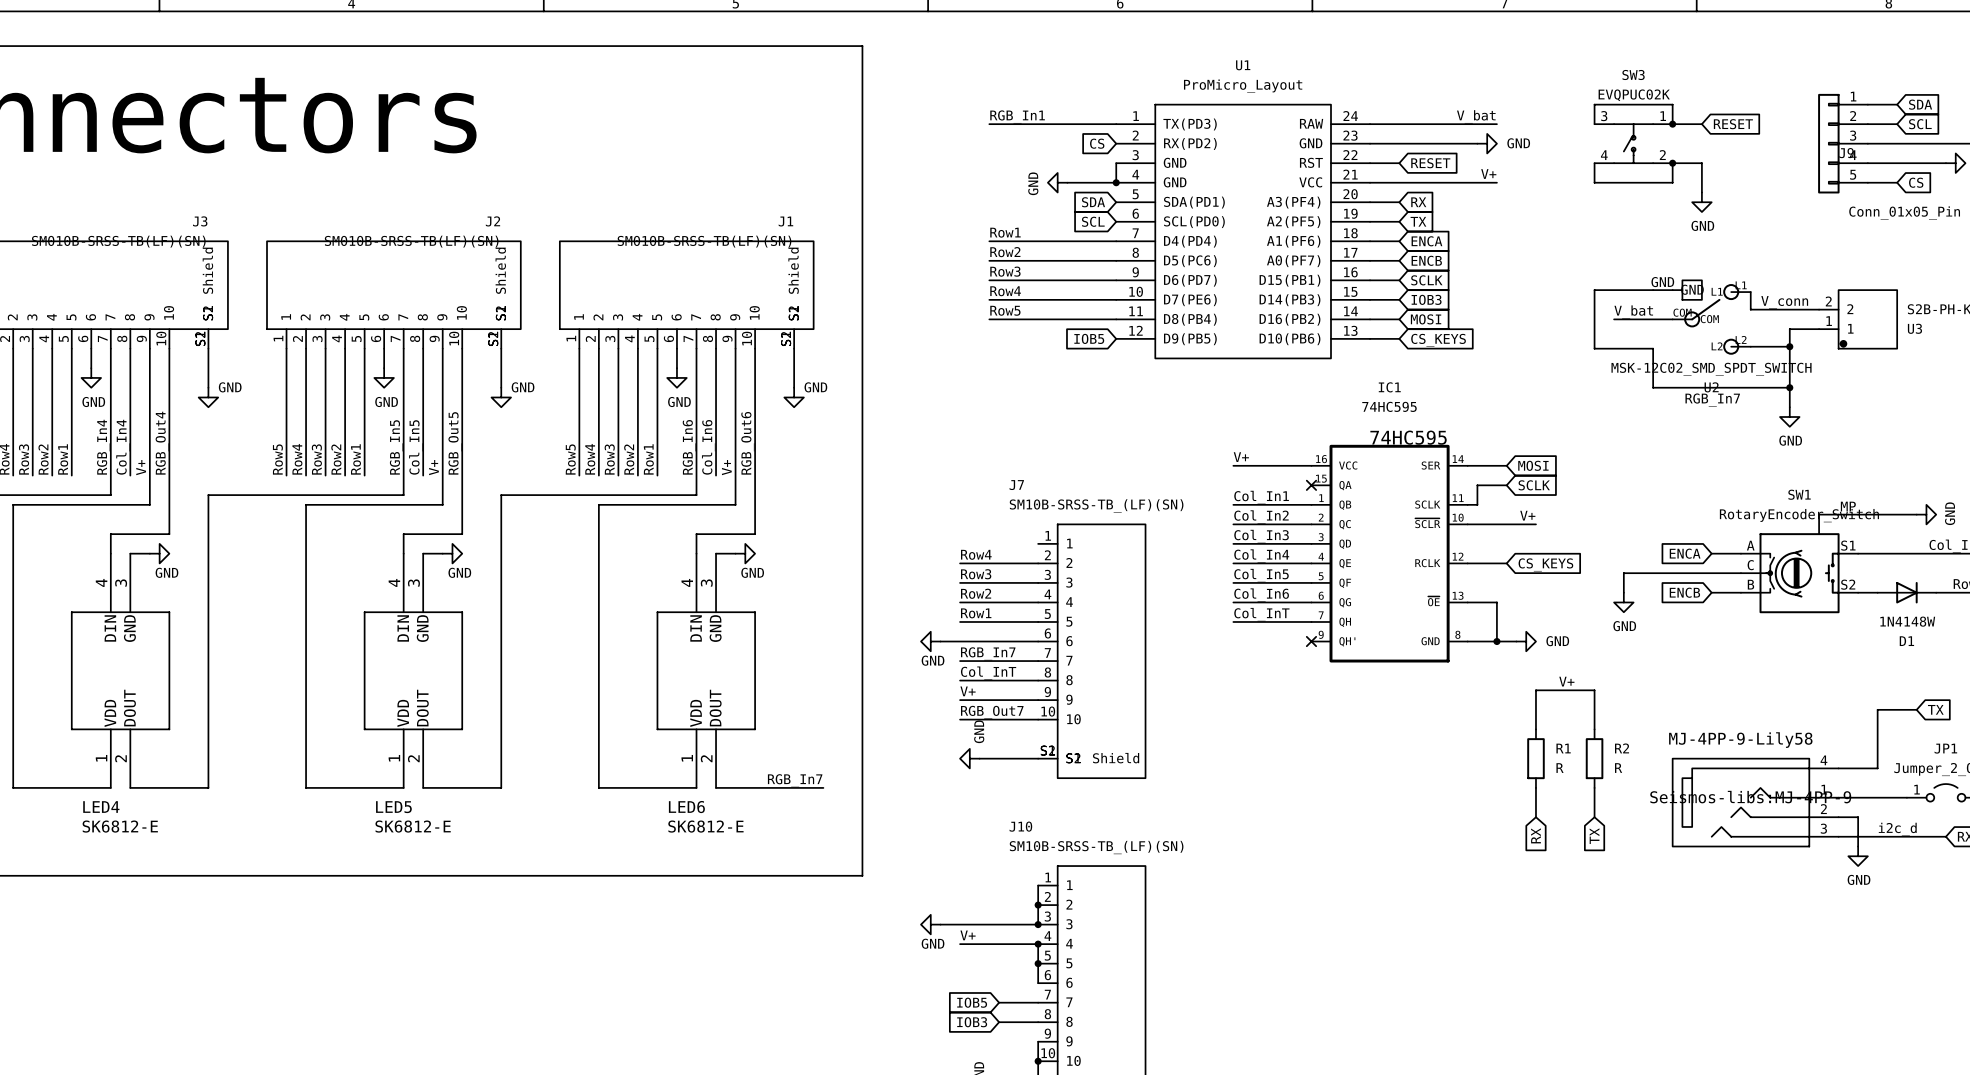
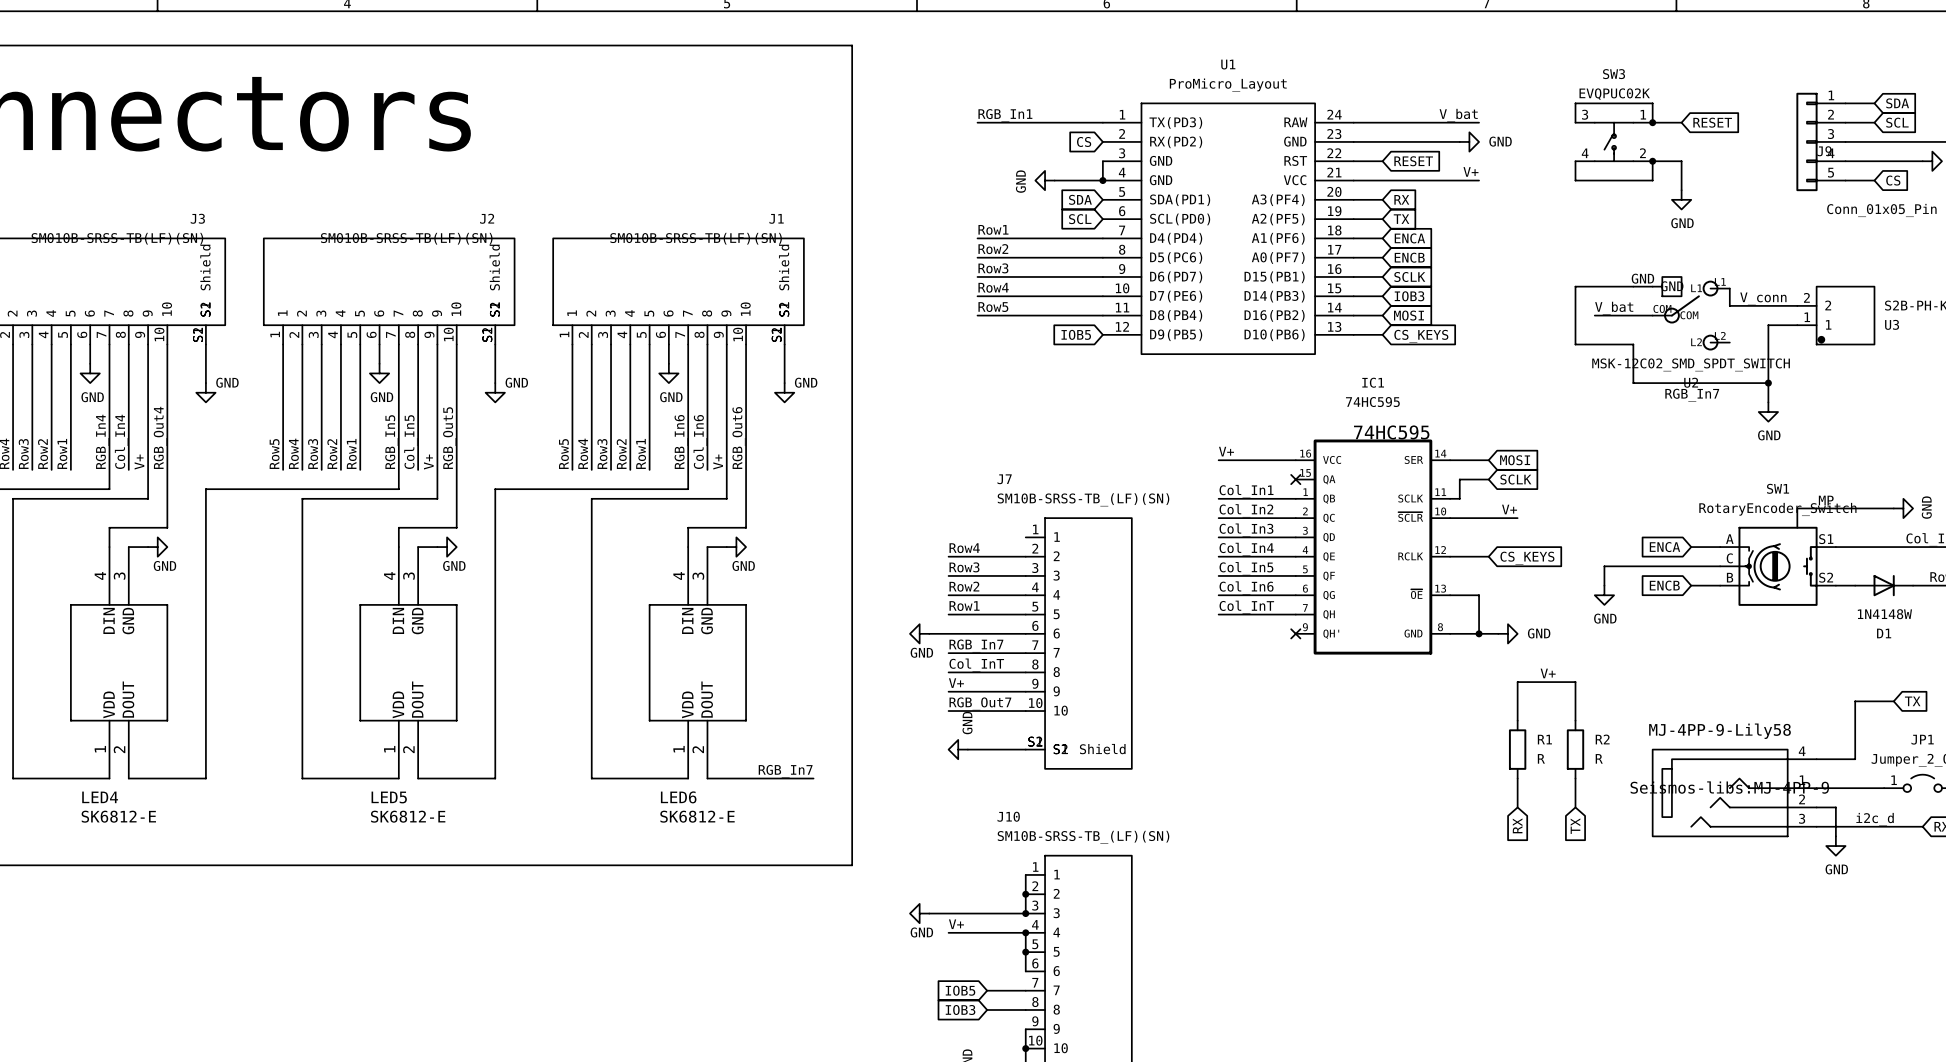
wire: (1750, 346) (1789, 346) -> none
junction: (1789, 346) -> none

